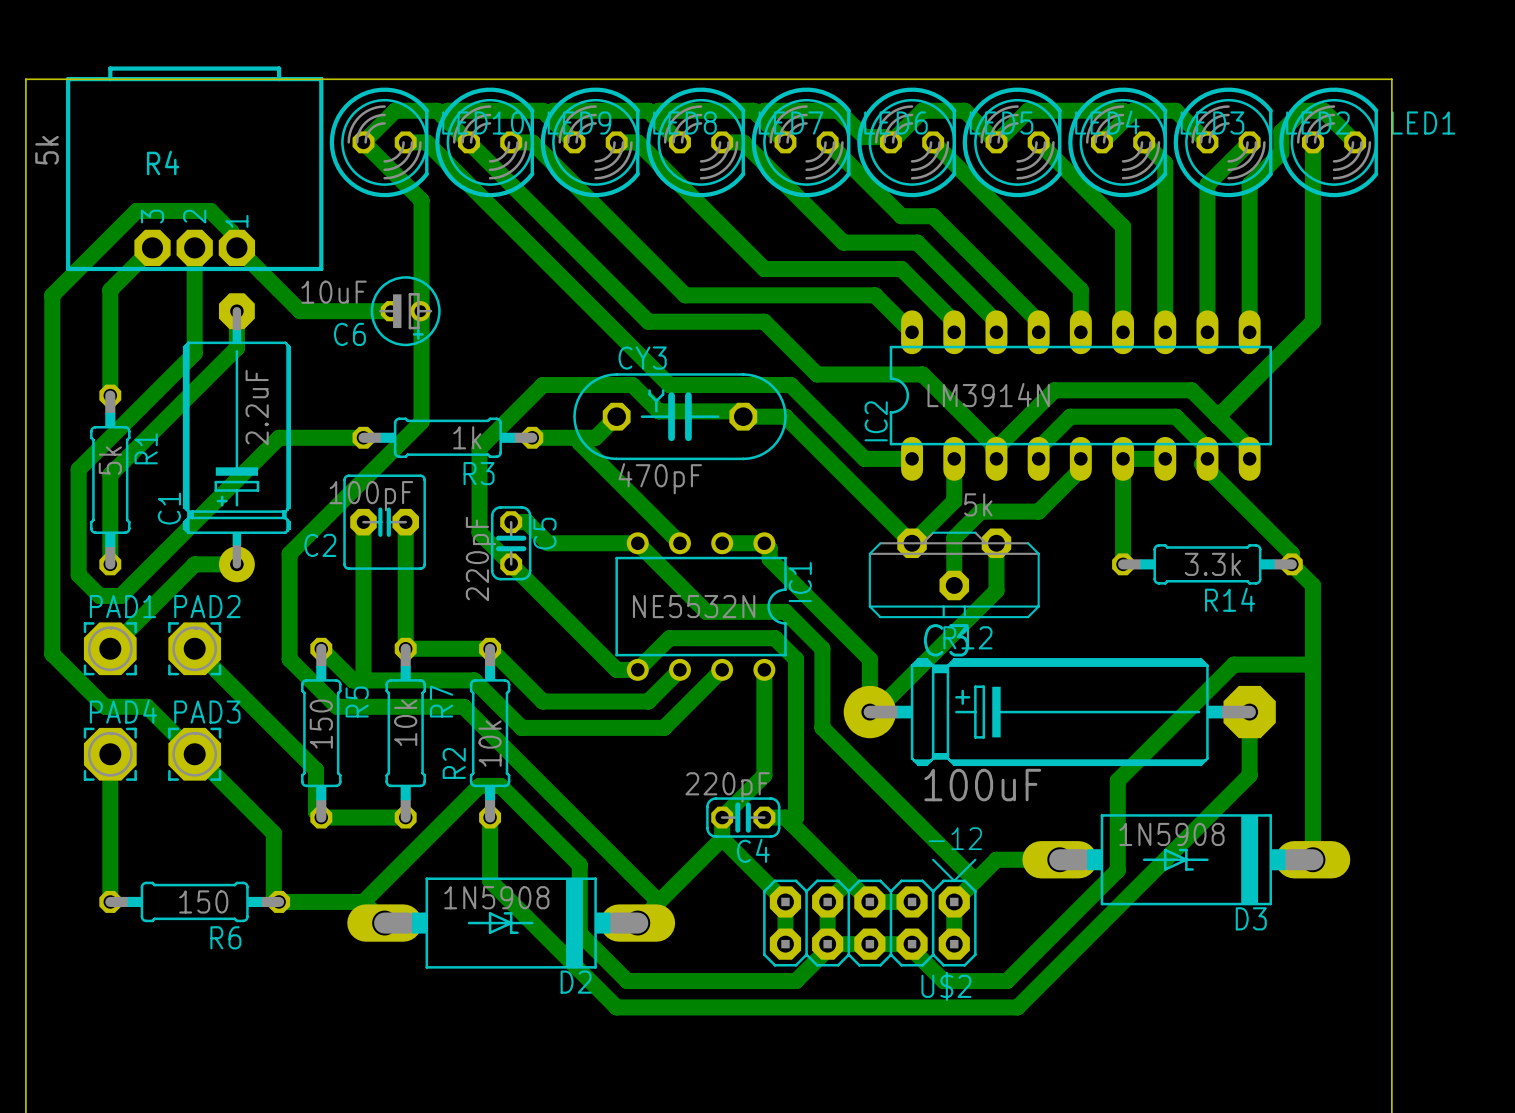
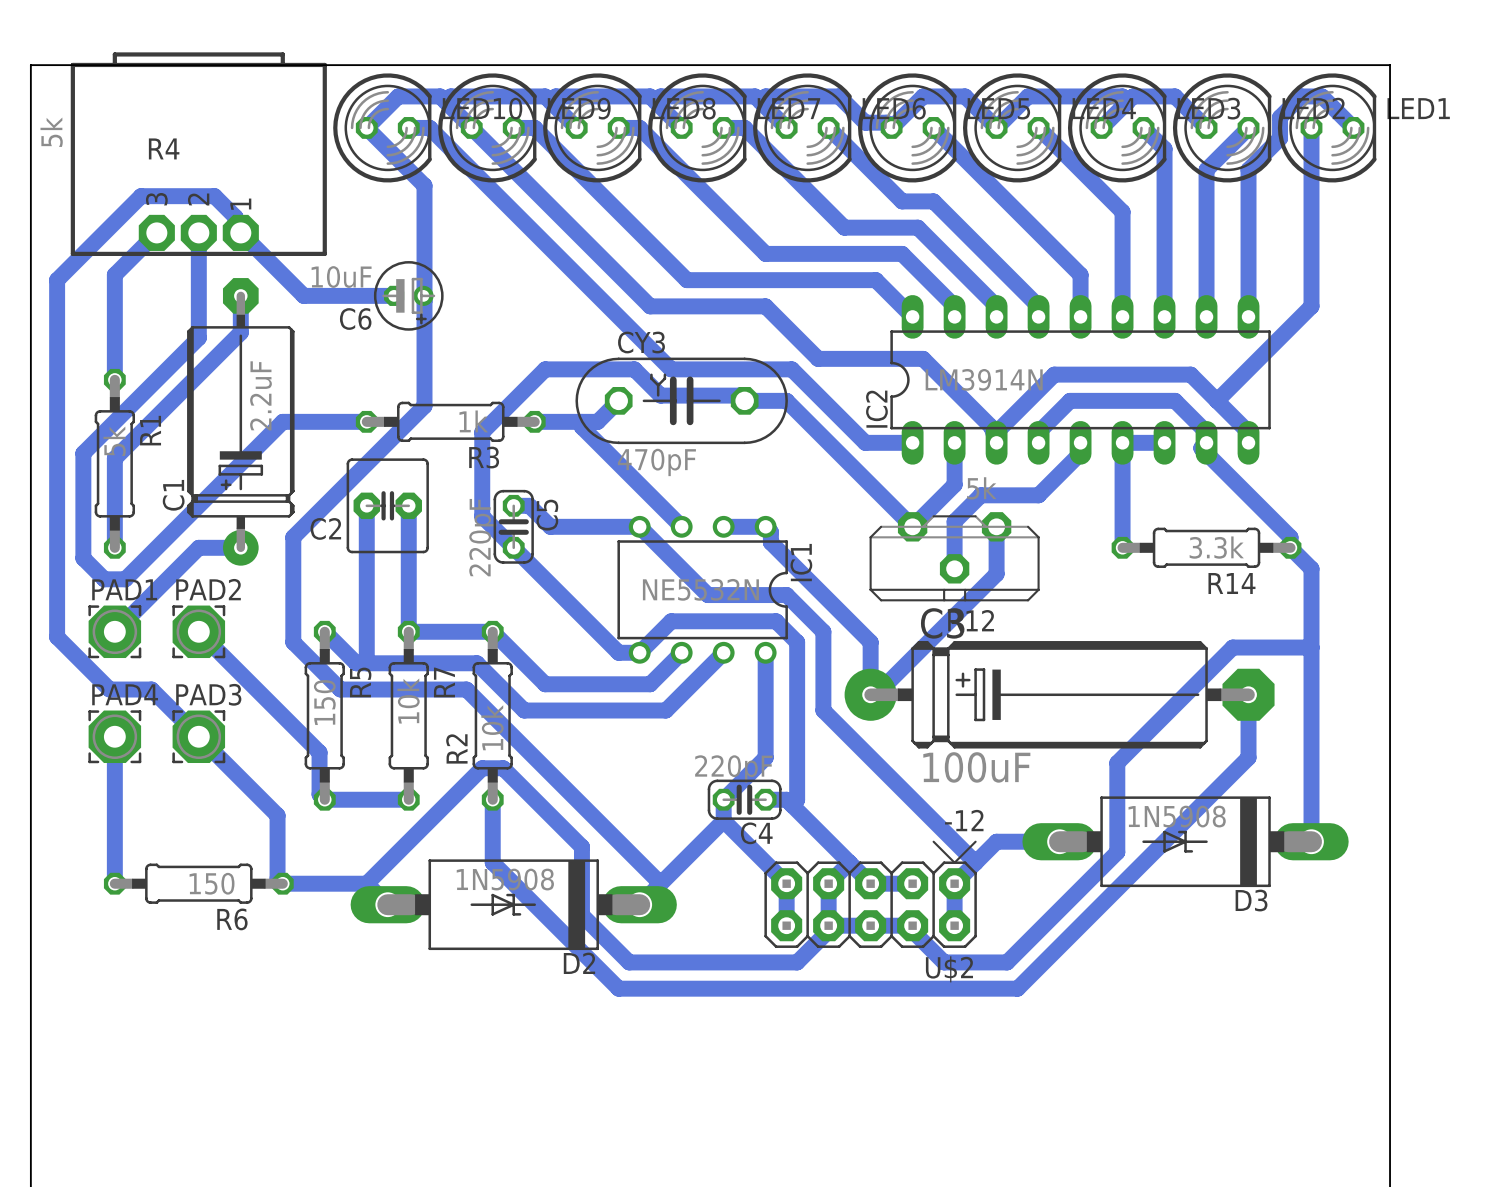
C2 value: 100pF (371, 496) -> none

